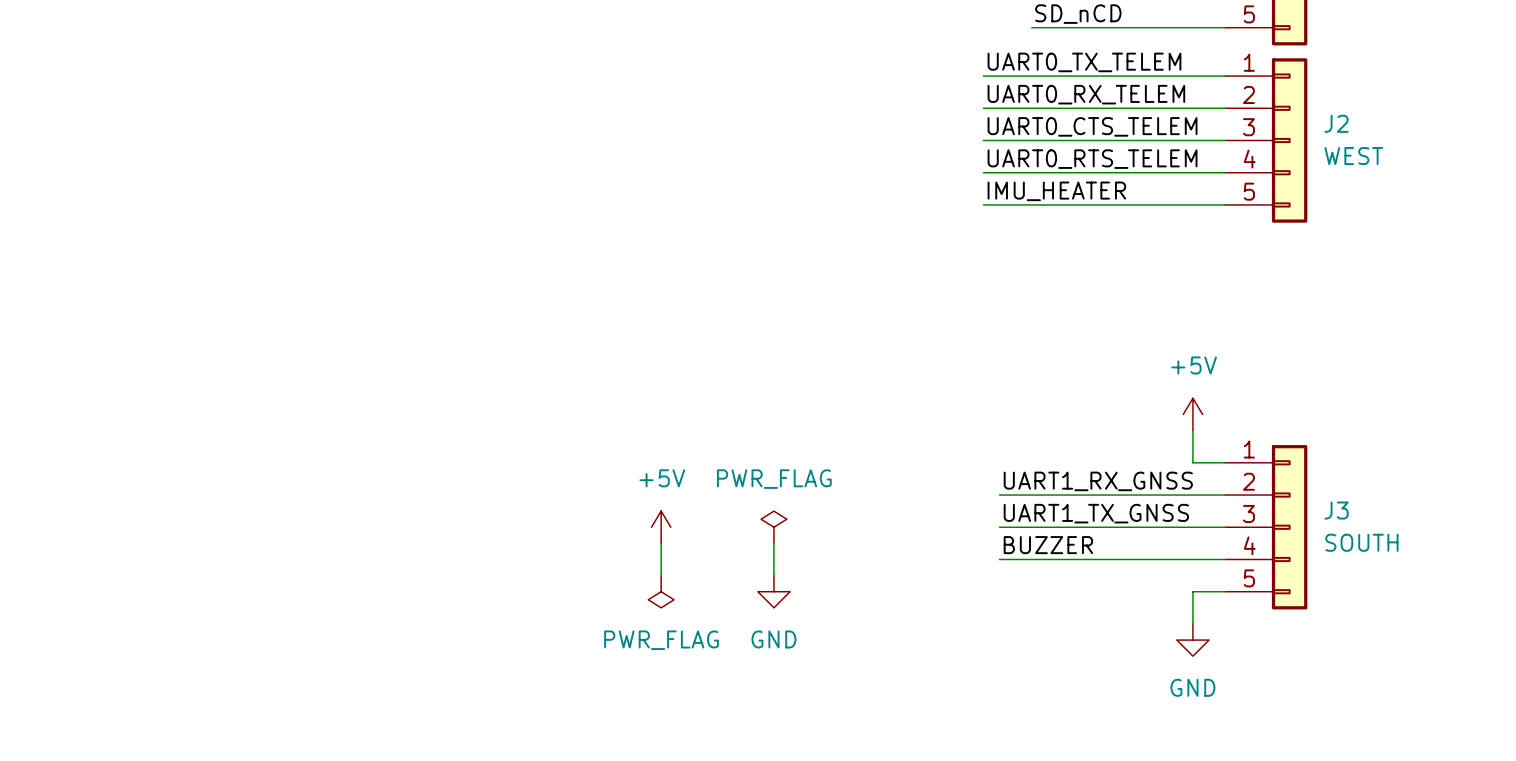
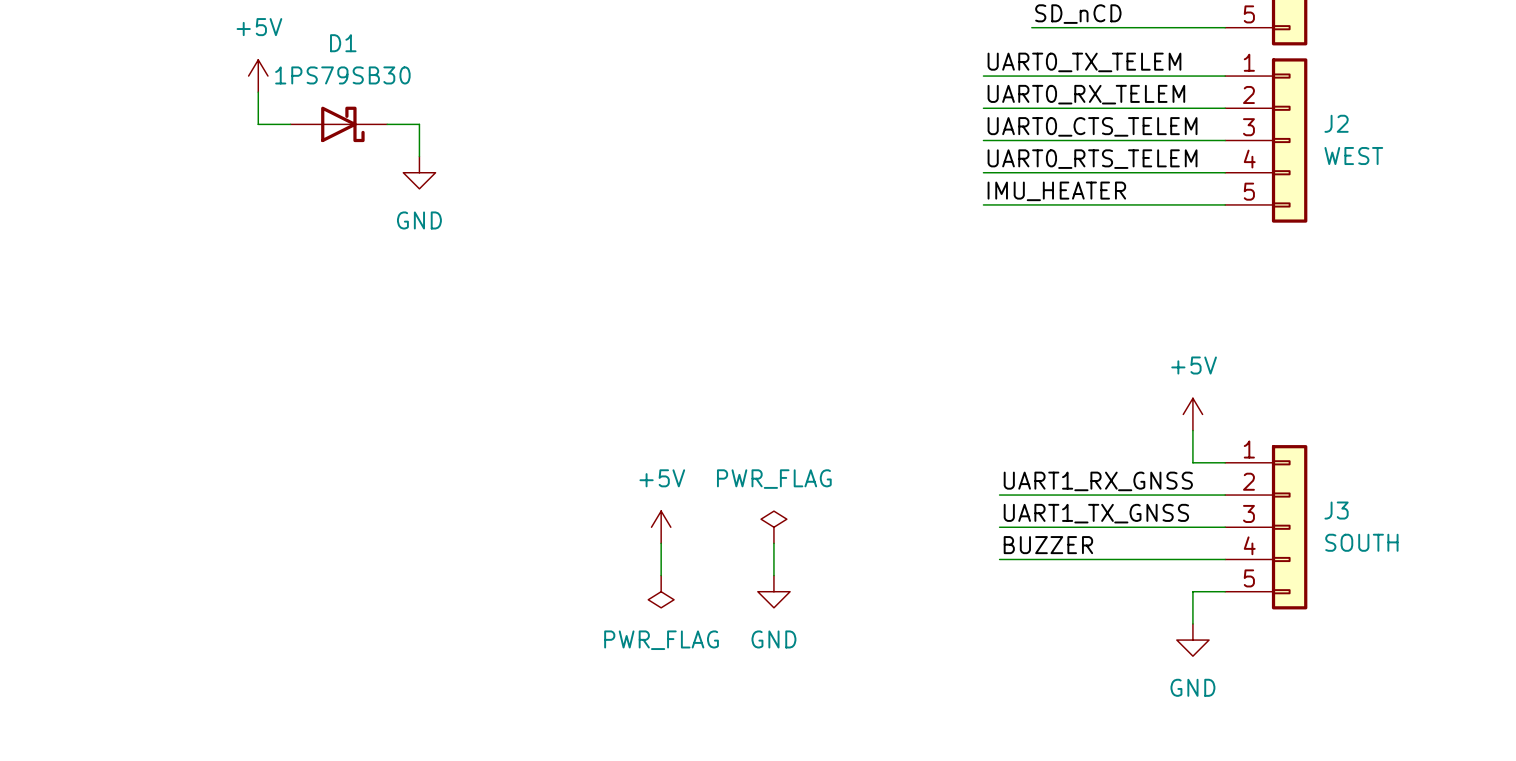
power symbol: none -> +5V (258, 76)
wire: none -> (258, 92) (258, 124) (290, 124)
D1: none -> 1PS79SB30 (338, 124)
wire: none -> (387, 124) (419, 124) (419, 156)
power symbol: none -> GND (419, 172)

